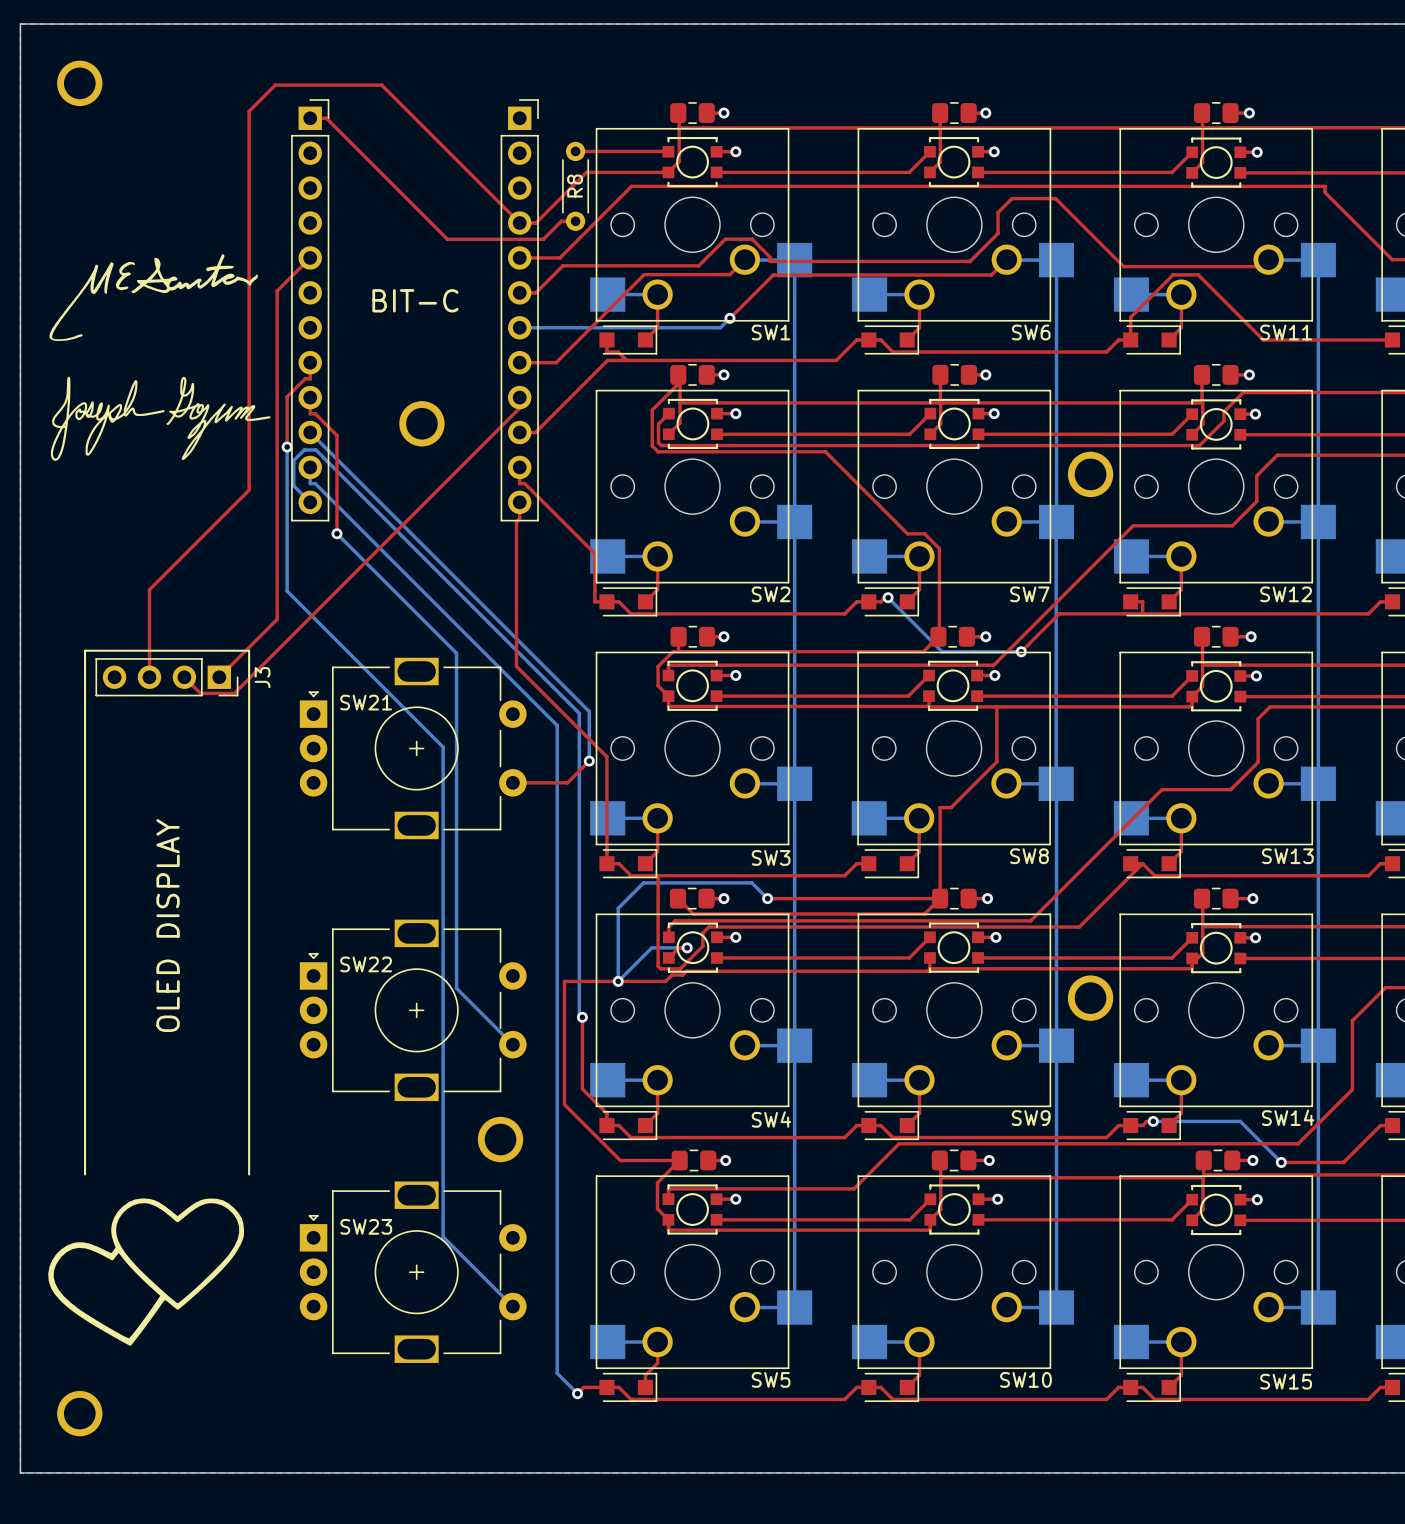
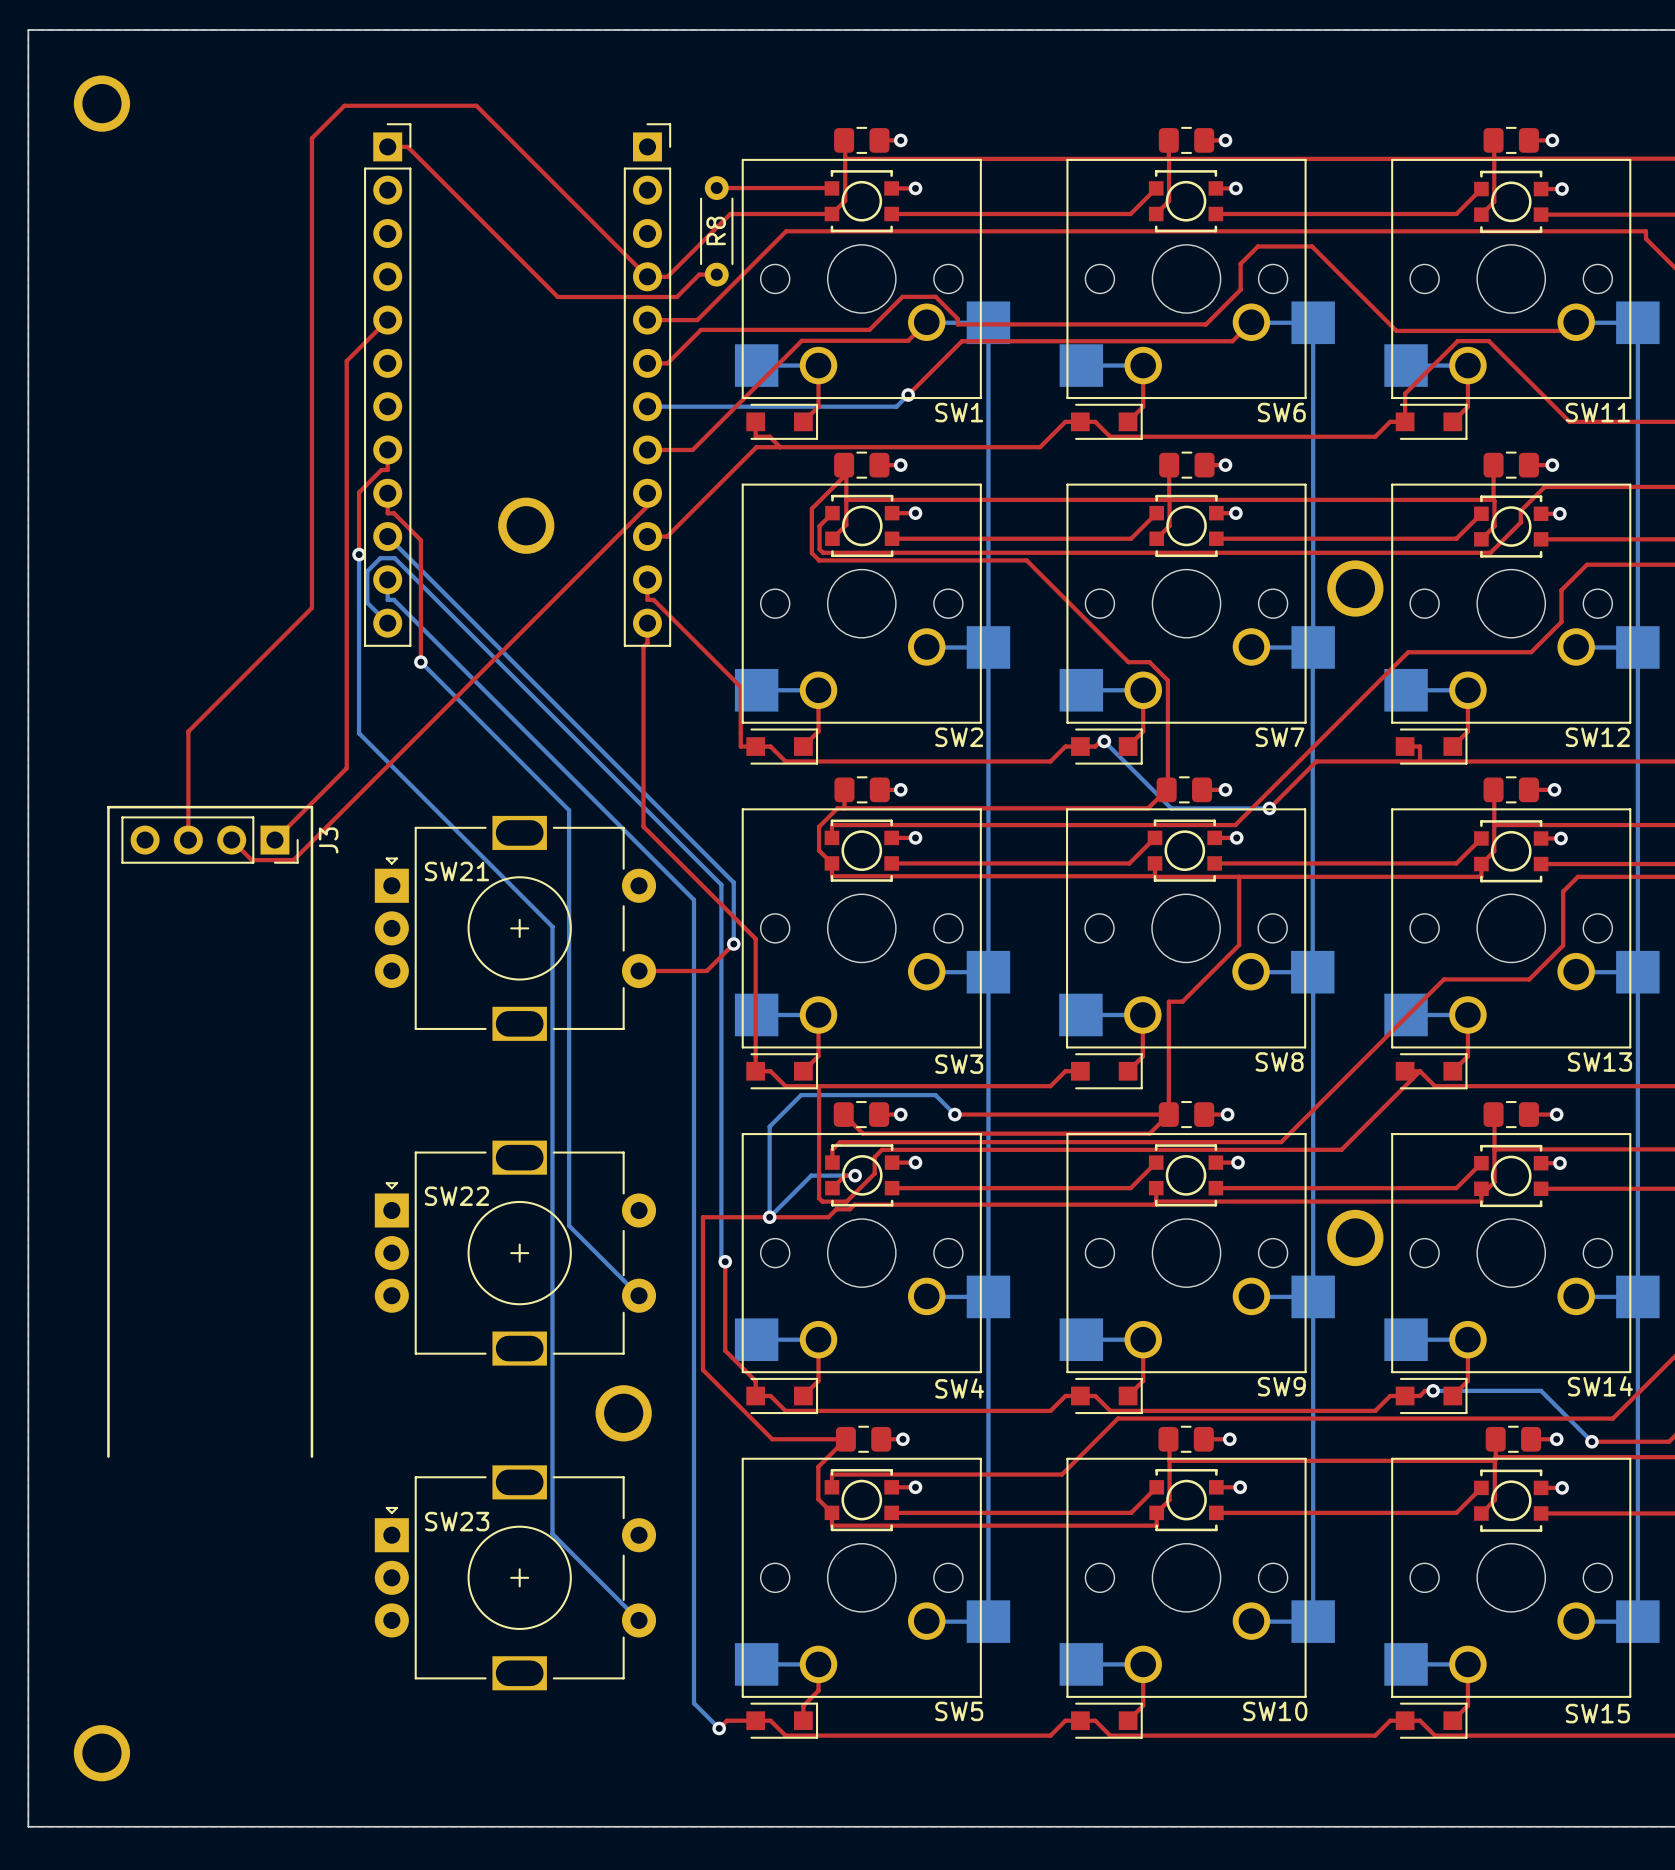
drawing: [48, 254, 258, 342] -> none
text: BIT-C (415, 300) -> none
drawing: [50, 376, 271, 461] -> none
text: OLED DISPLAY (168, 925) -> none
drawing: [48, 1198, 245, 1346] -> none

